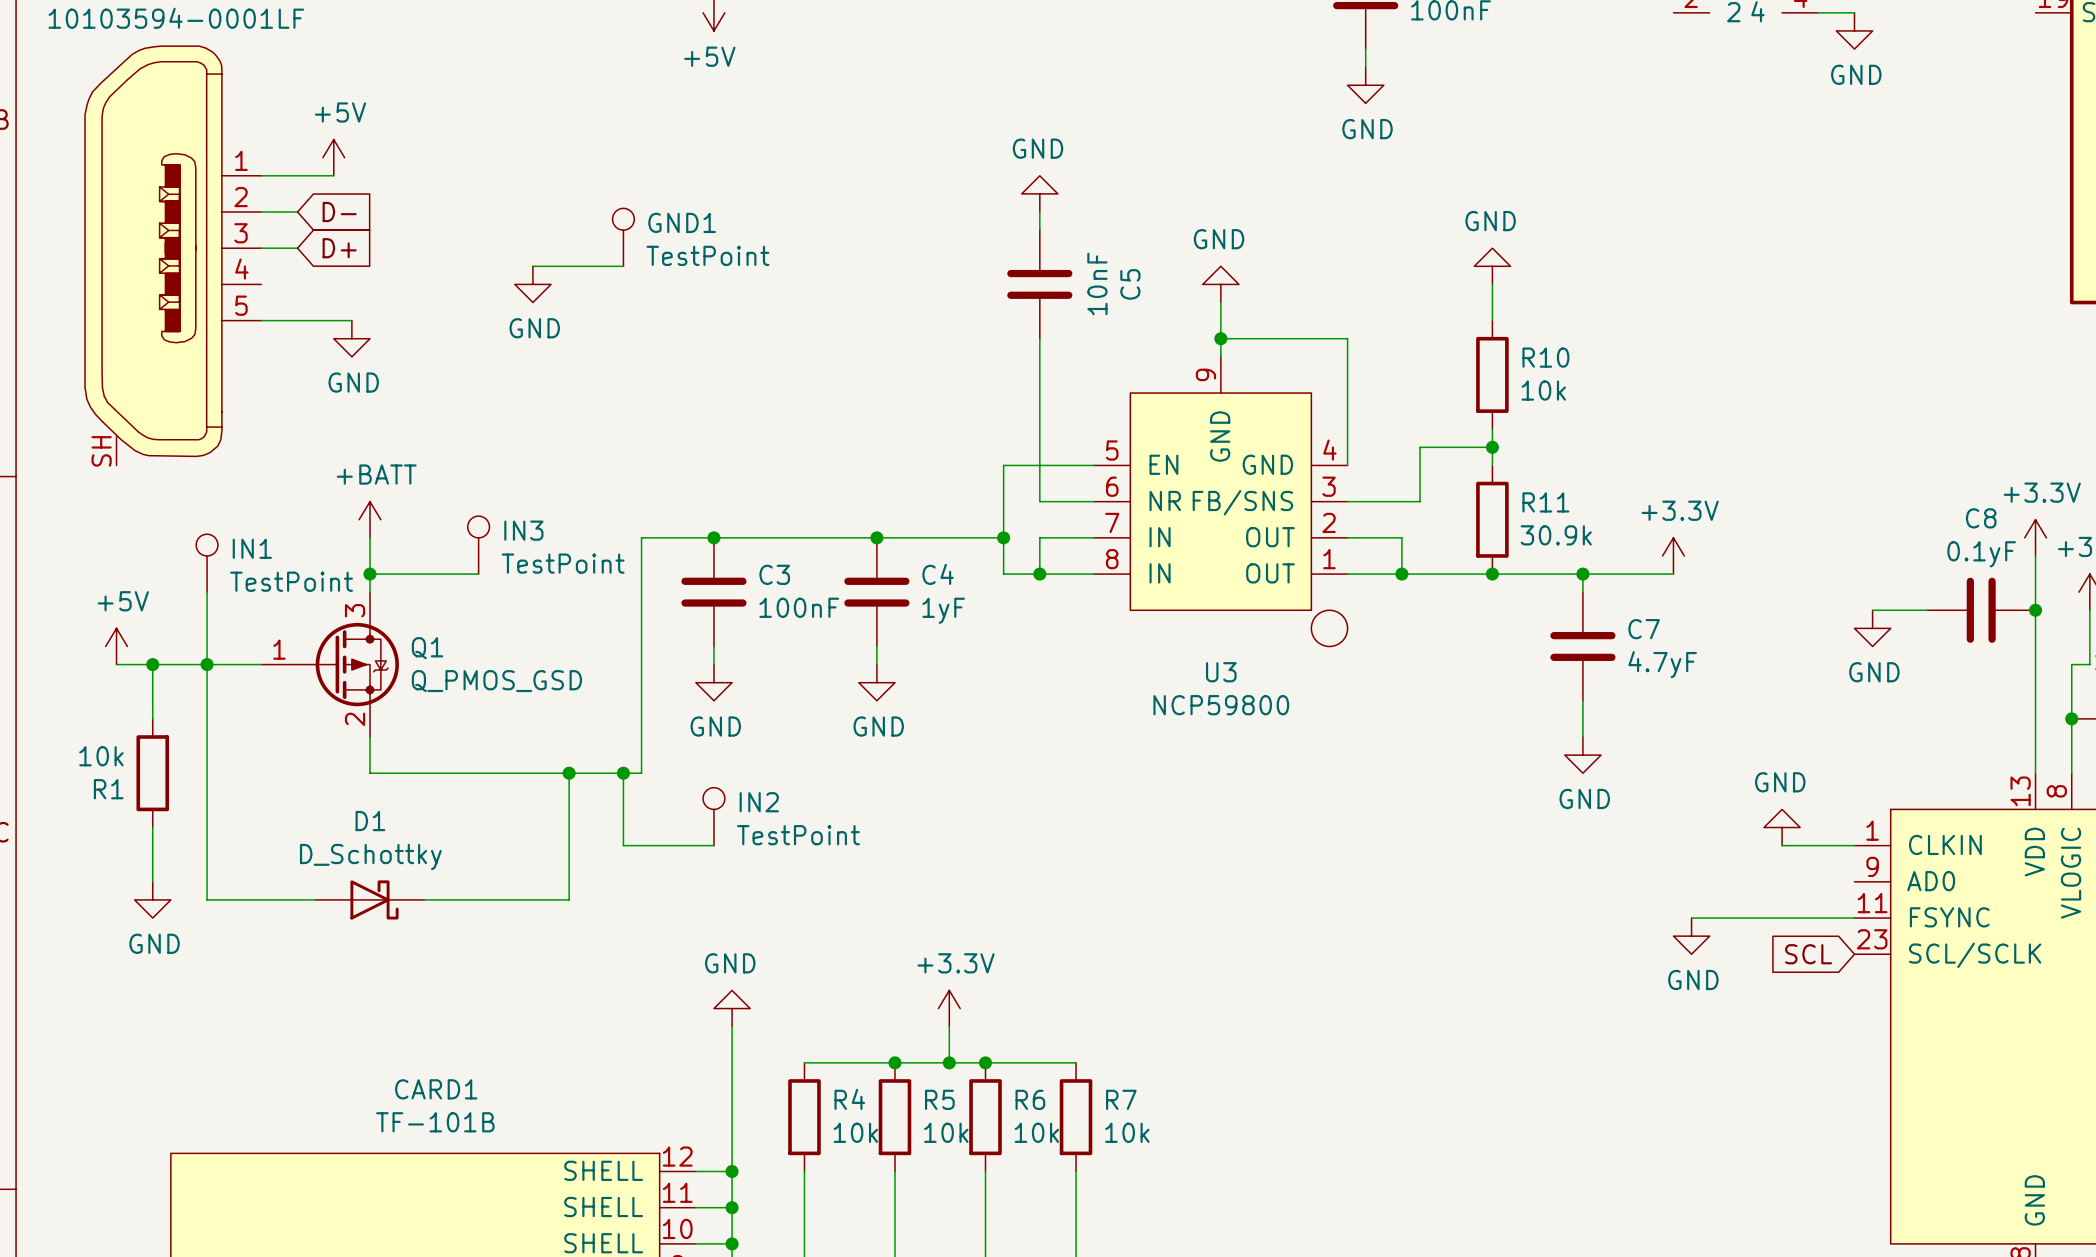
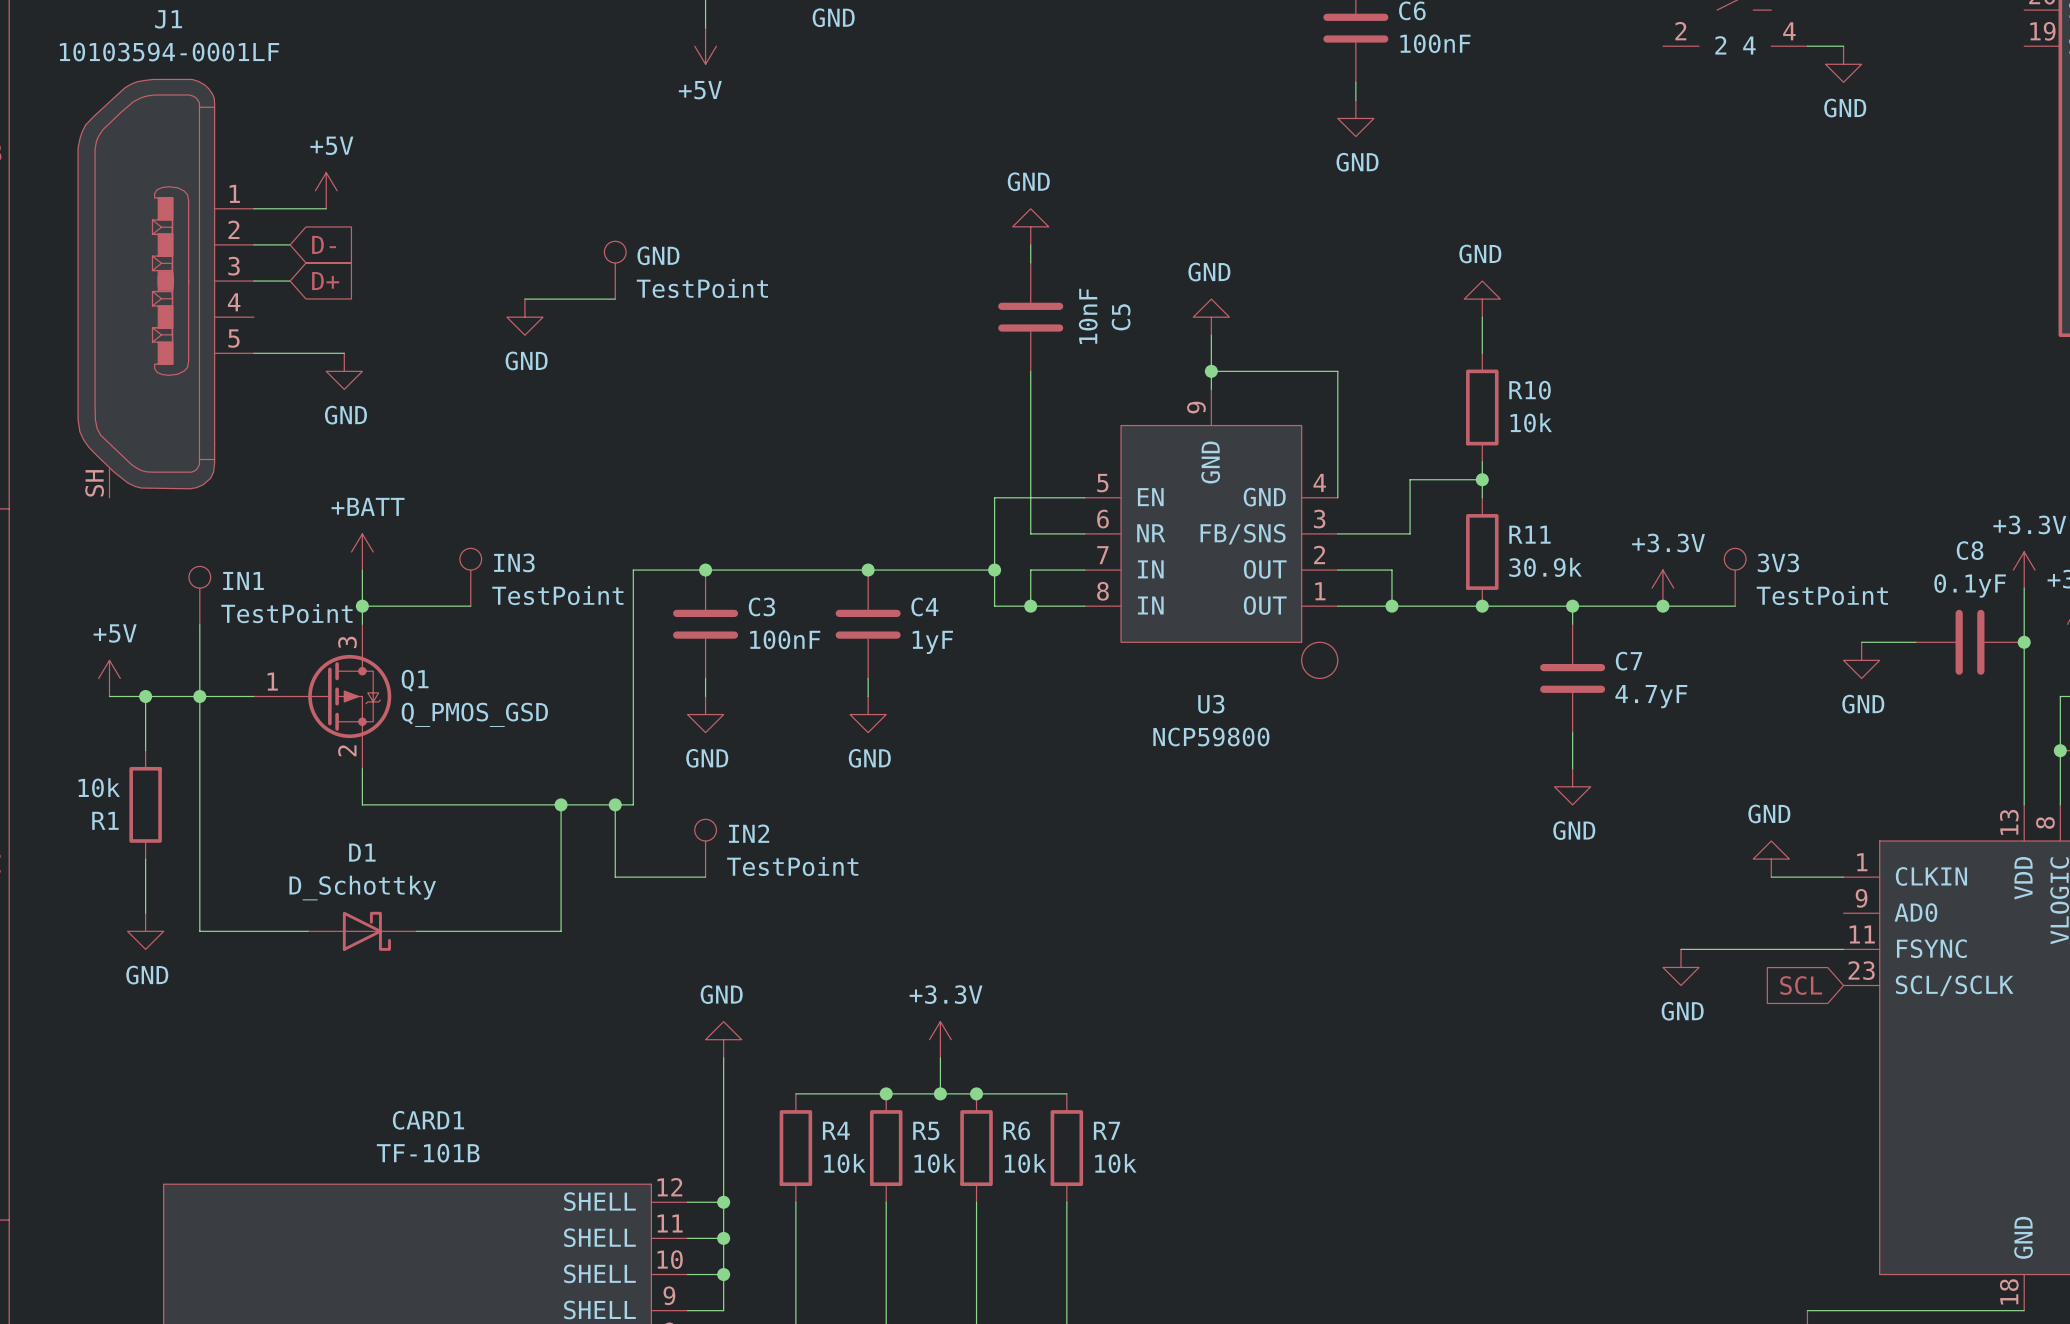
GND1 name: GND1 (682, 222) -> GND (658, 255)
3V3: none -> TestPoint (1735, 577)
wire: none -> (1662, 606) (1735, 606)
junction: none -> (1662, 606)

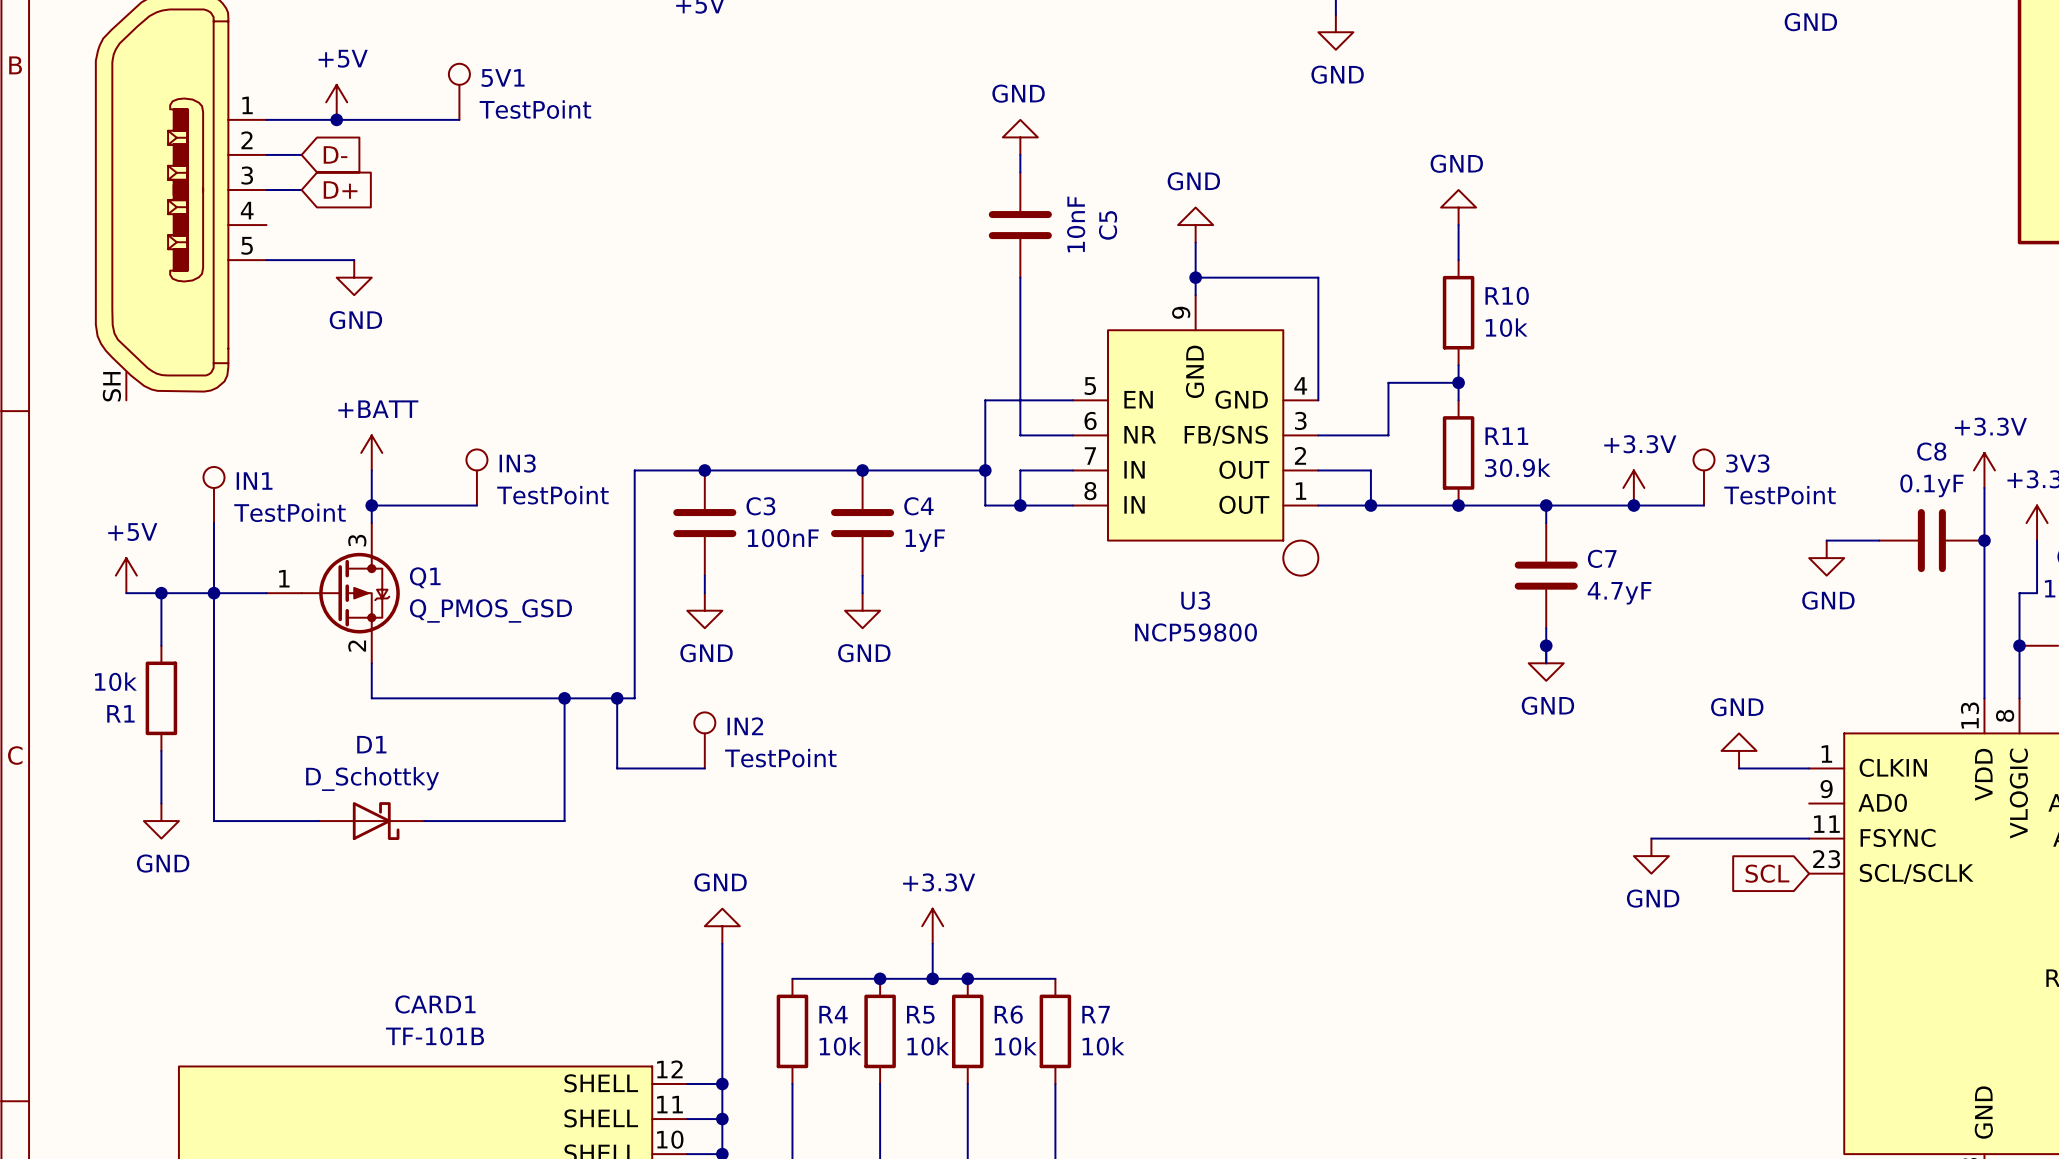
5V1: none -> TestPoint (459, 91)
wire: none -> (336, 119) (459, 119)
junction: none -> (336, 119)
GND: TestPoint (615, 270) -> none
wire: (524, 299) (615, 299) -> none
power symbol: GND (524, 317) -> none
junction: none -> (1546, 645)
power symbol position: GND (1572, 786) -> GND (1546, 663)

